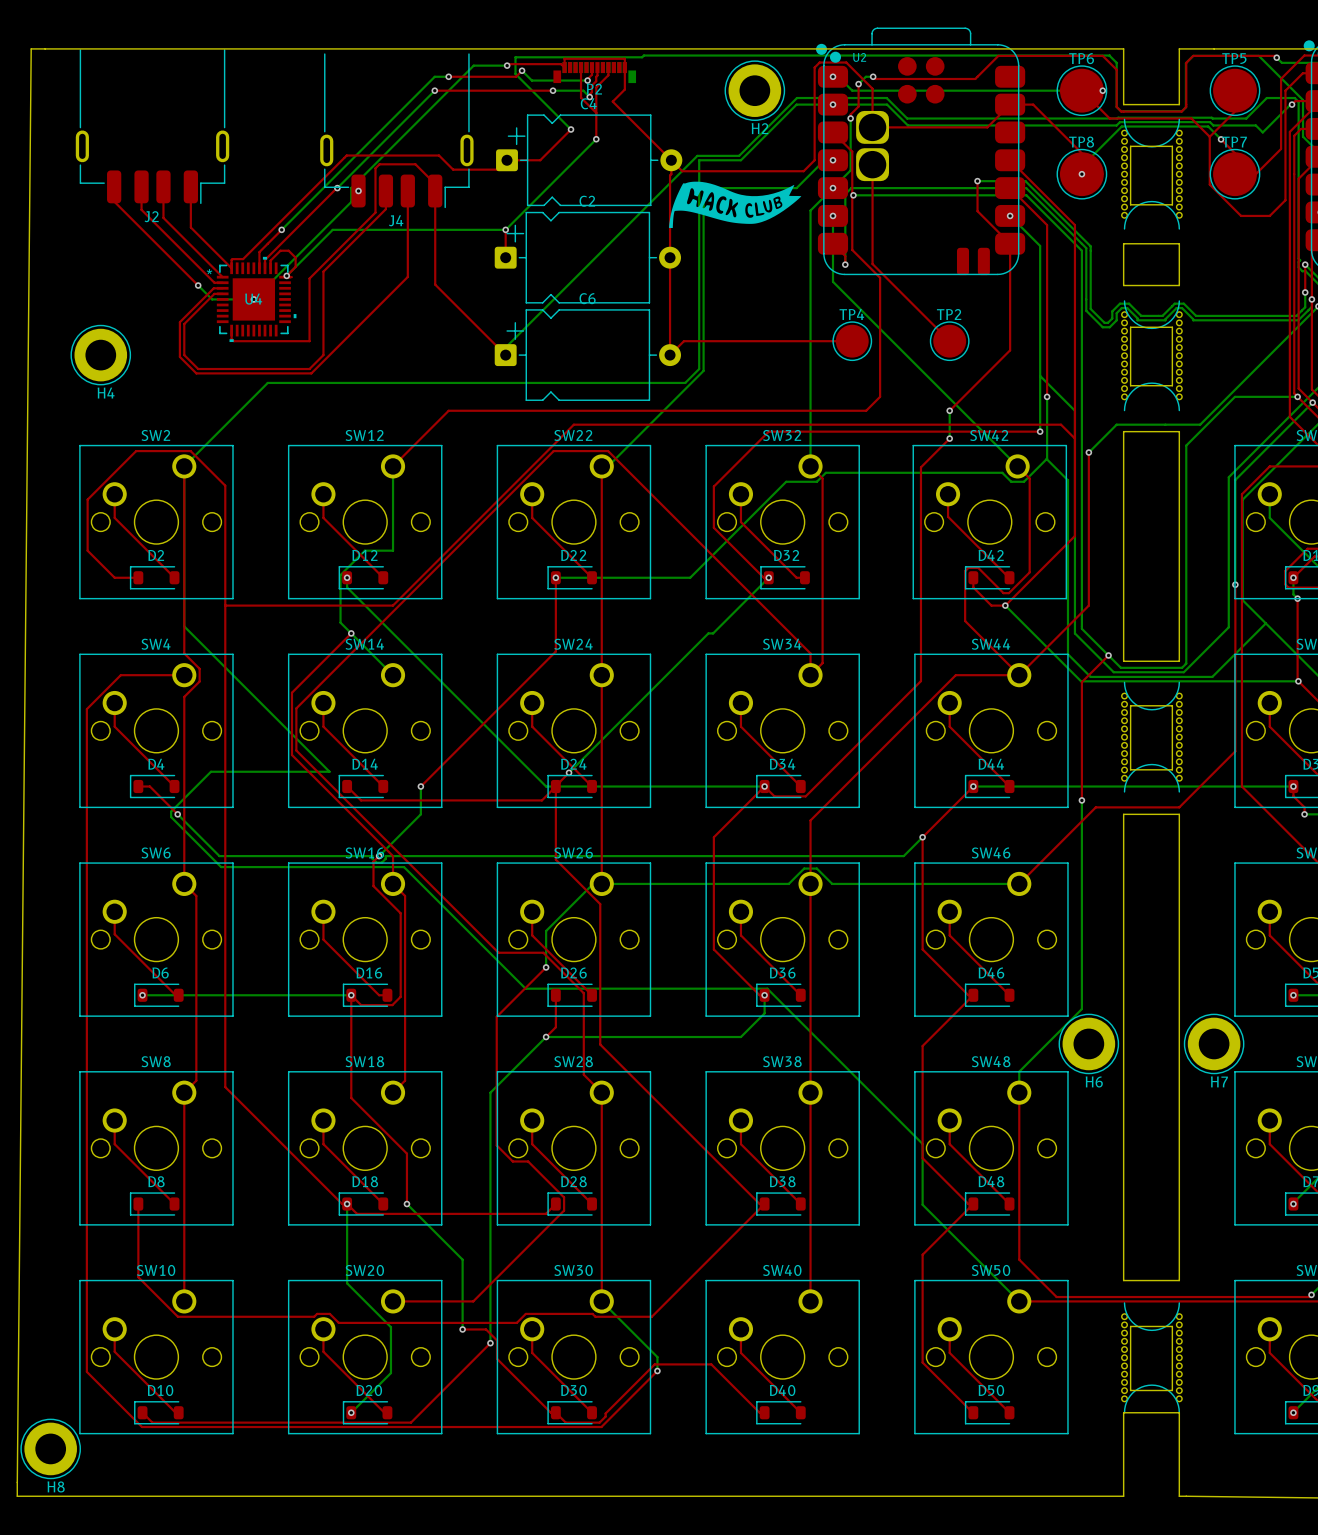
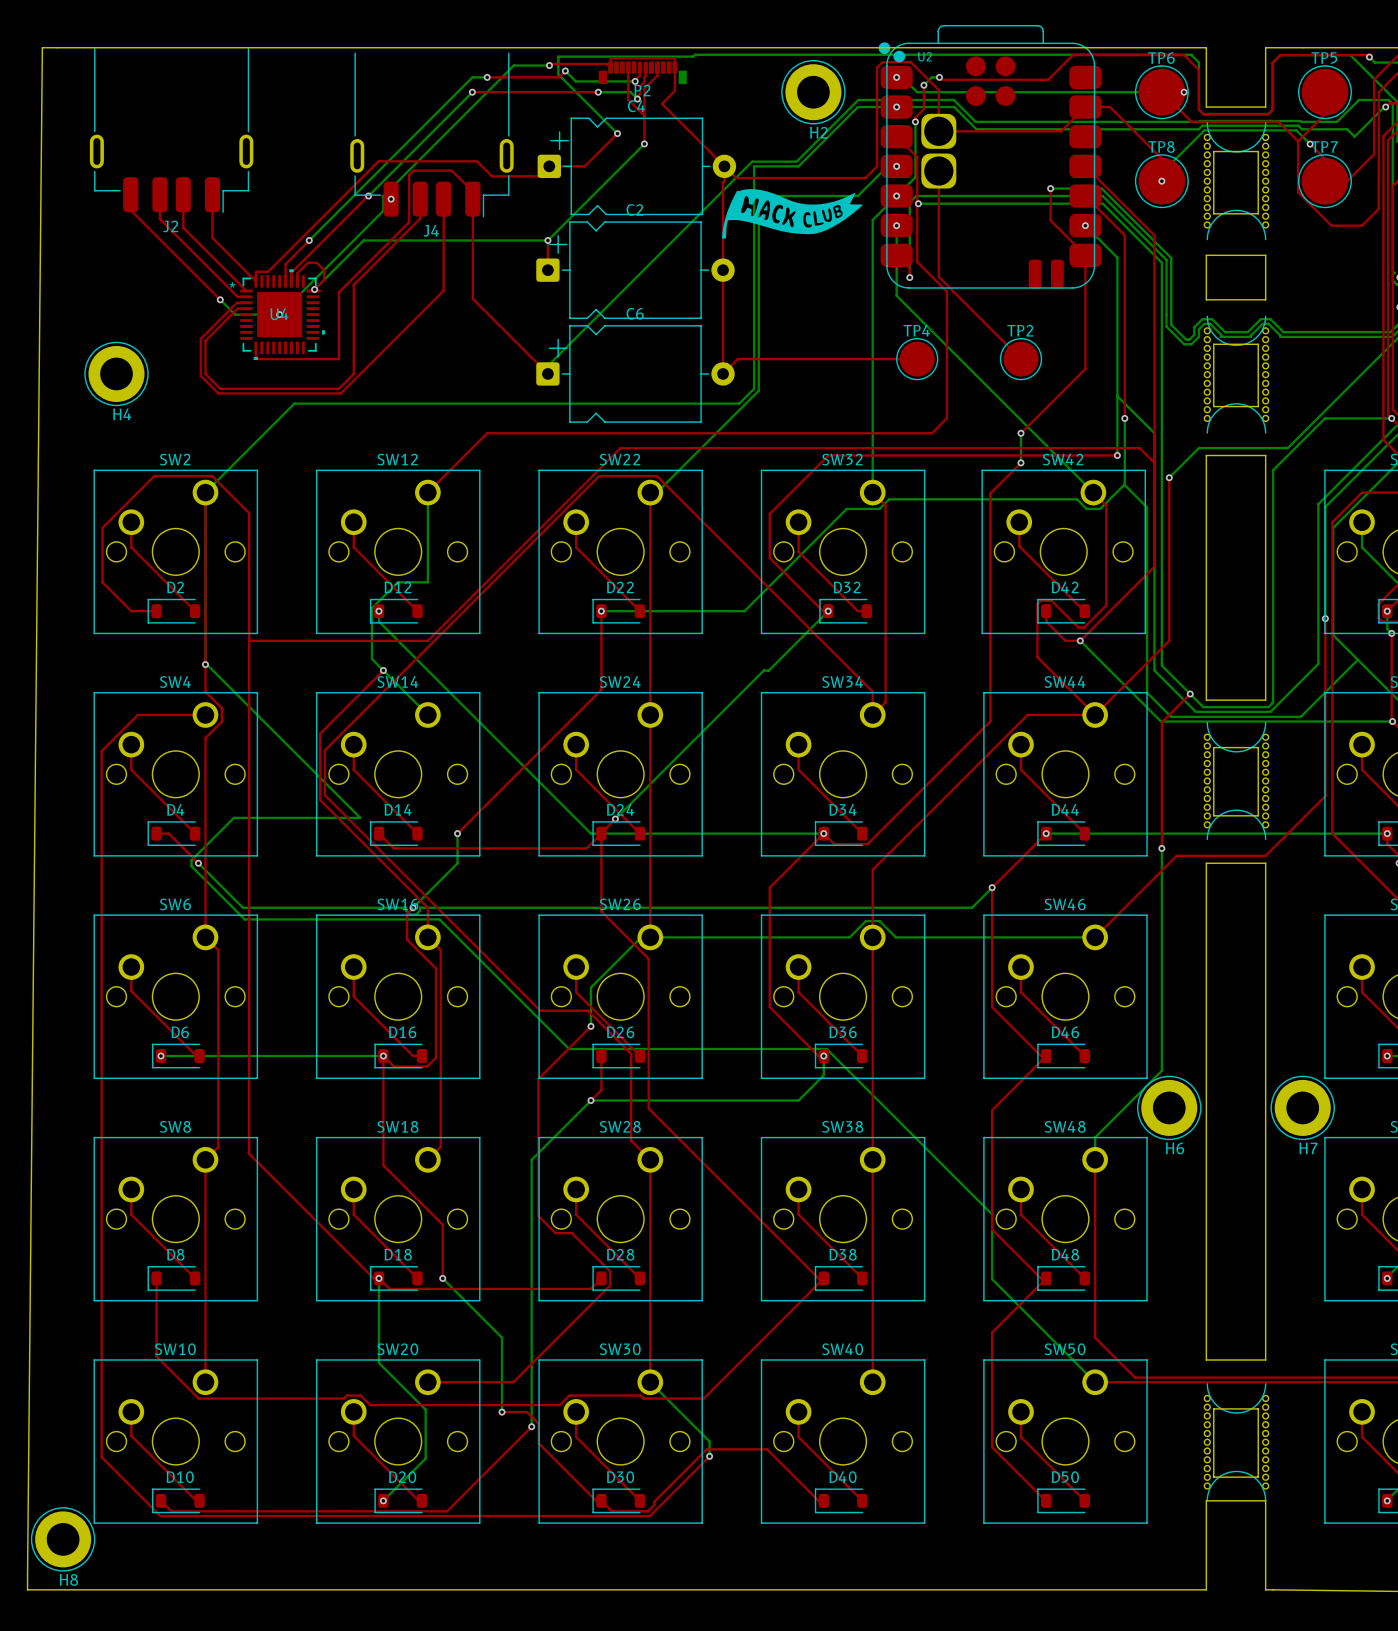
via: none -> (205, 664)

